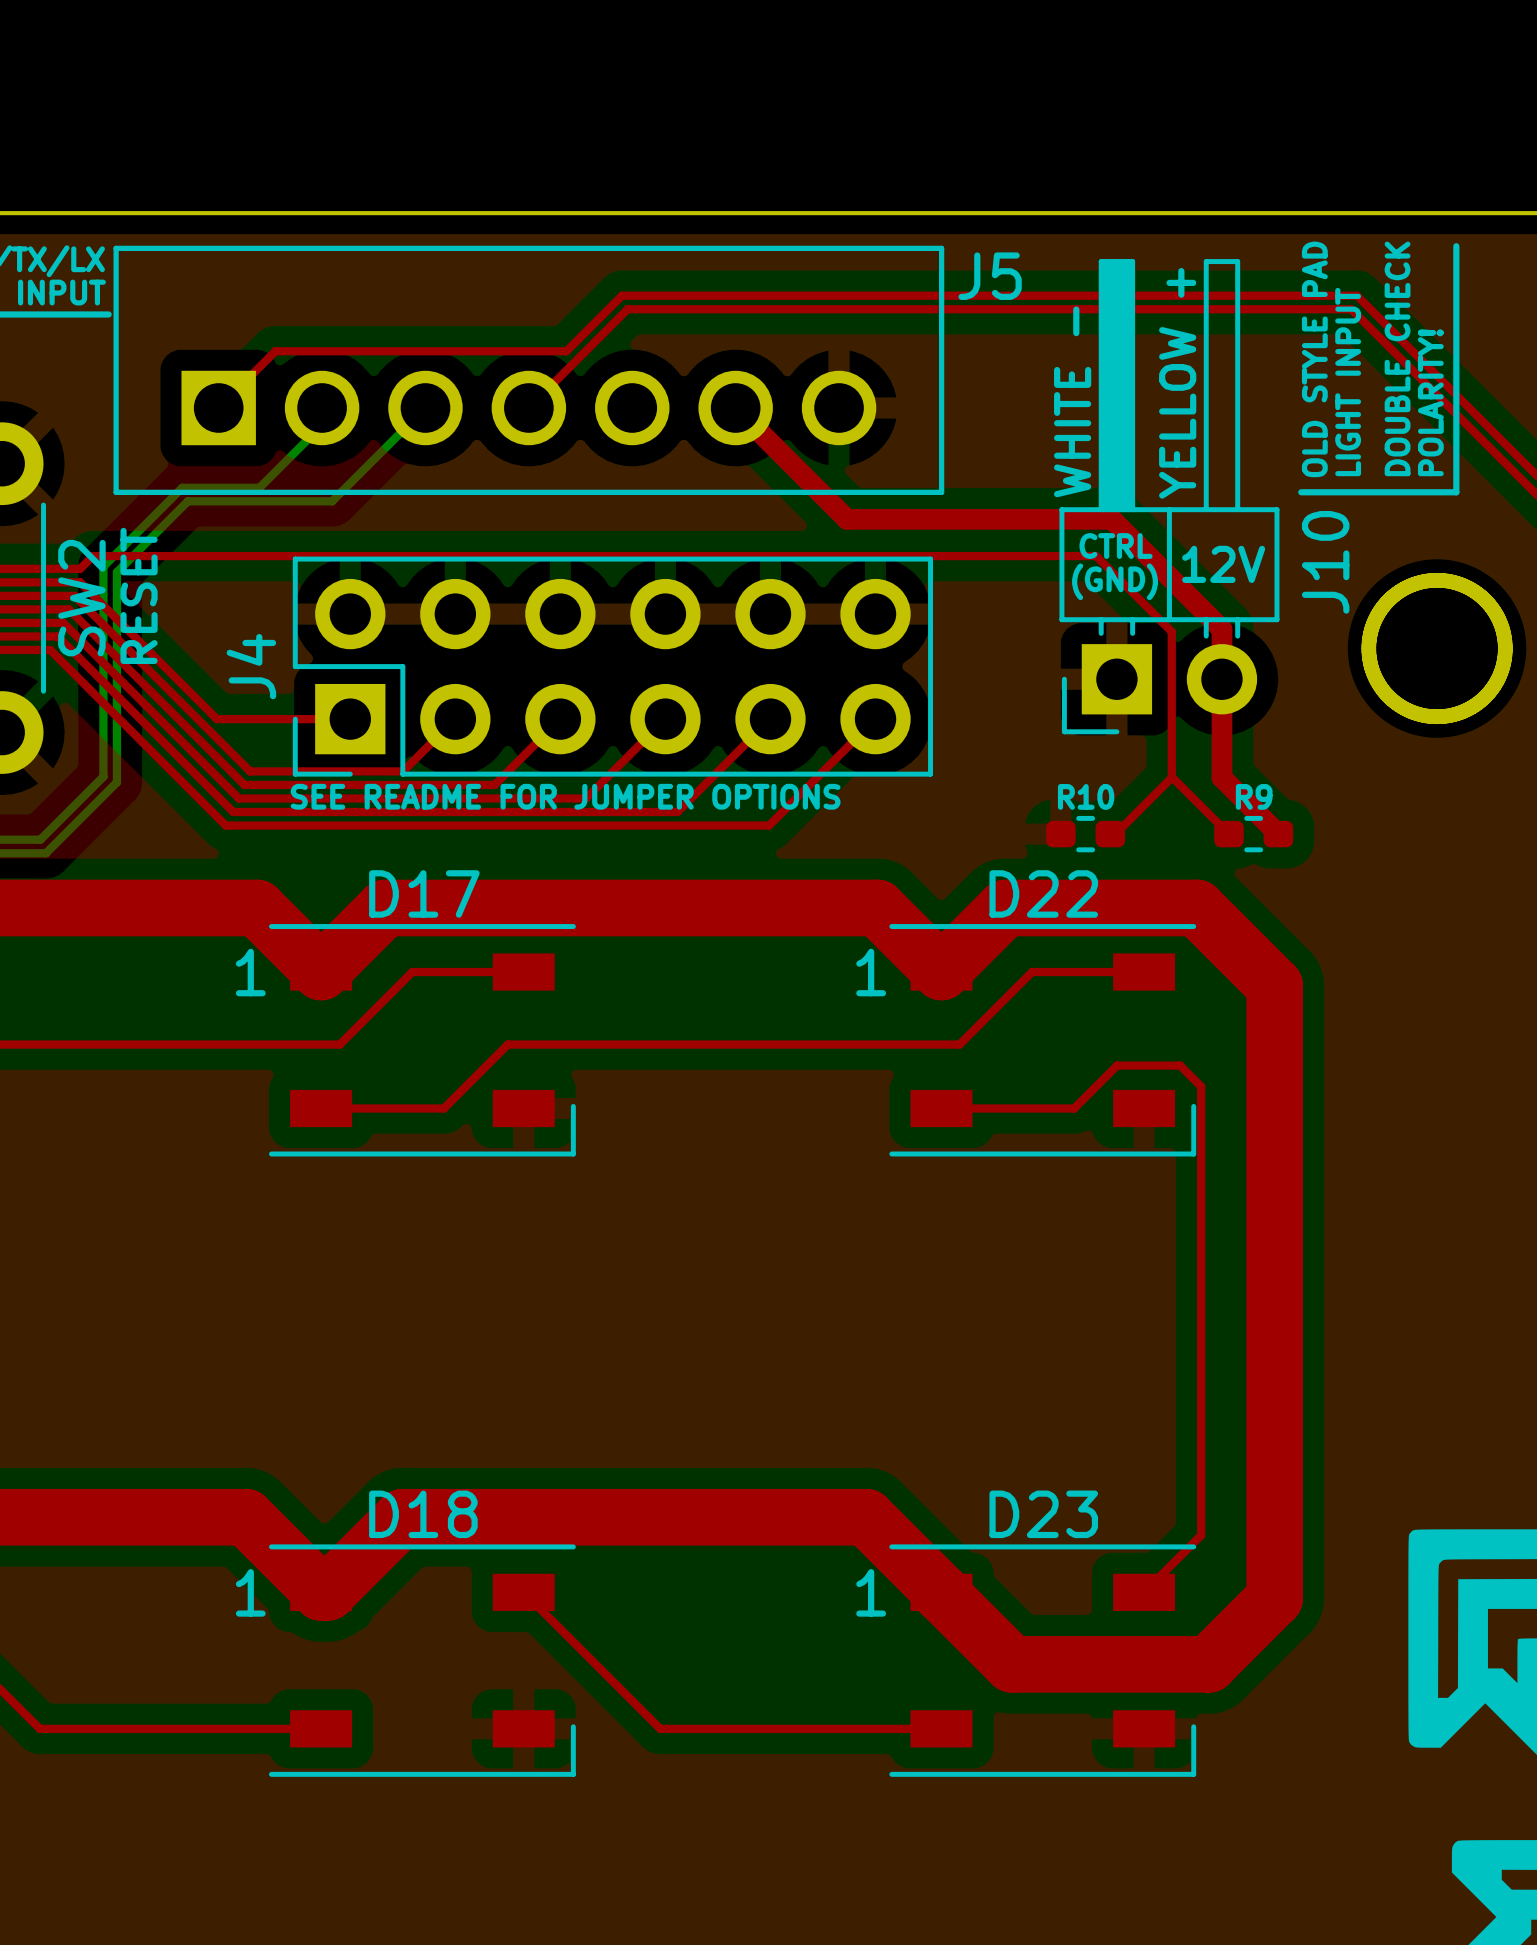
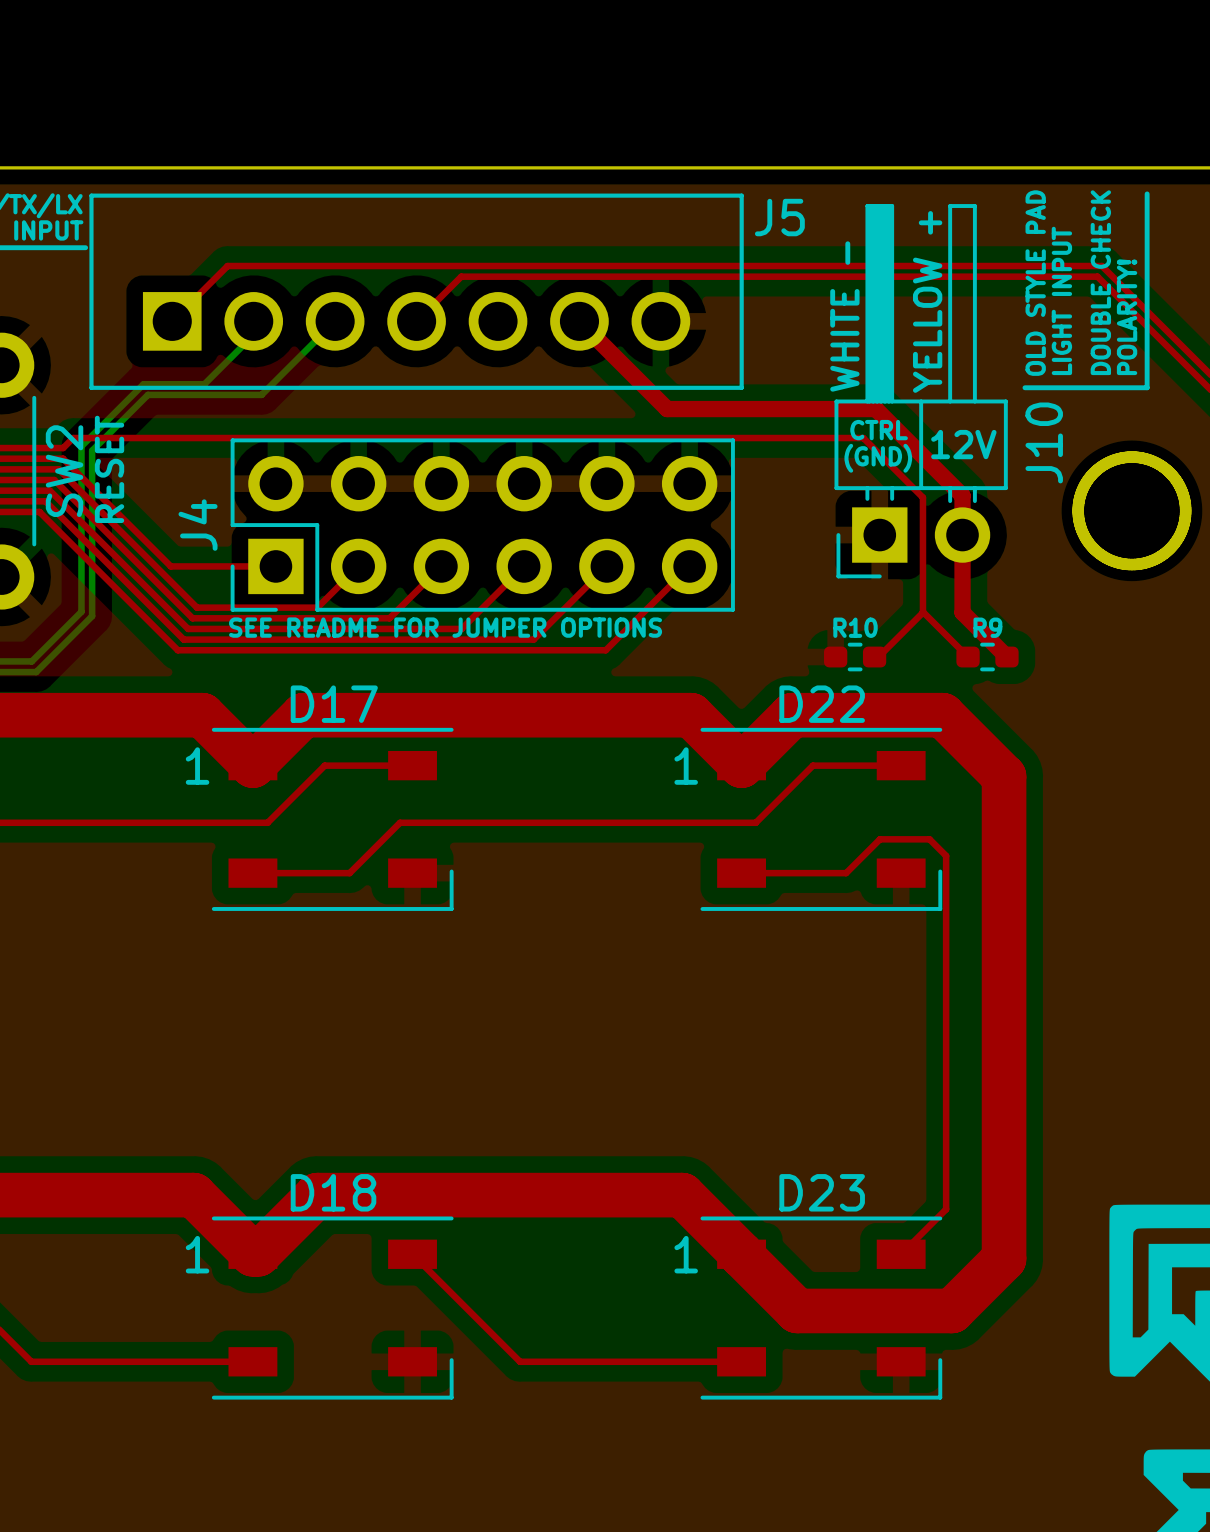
top track: (1398, 337) (1356, 295) (622, 295) (566, 351) (275, 351) -> (1101, 266) (227, 266) (216, 276)
top track: (585, 351) (627, 309) (1351, 309) (1393, 351) -> (461, 276) (1097, 276)

